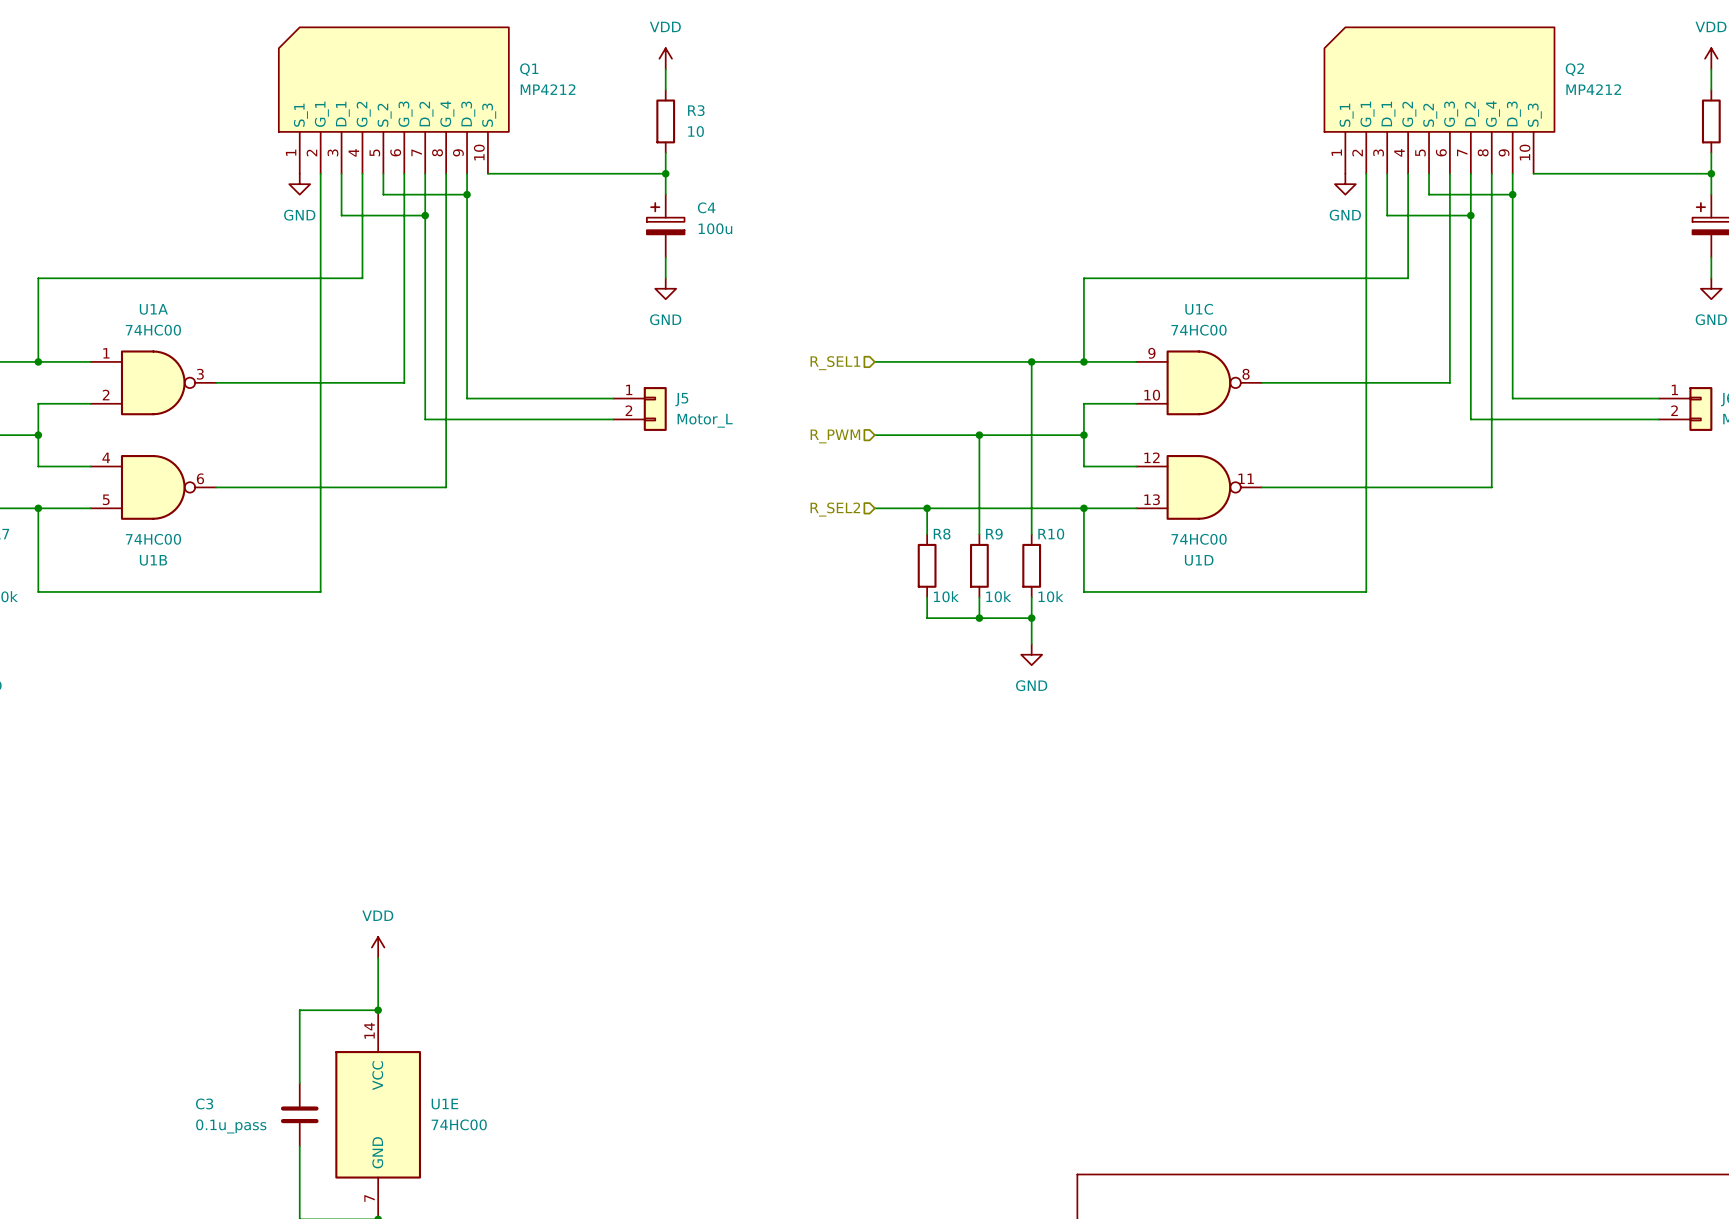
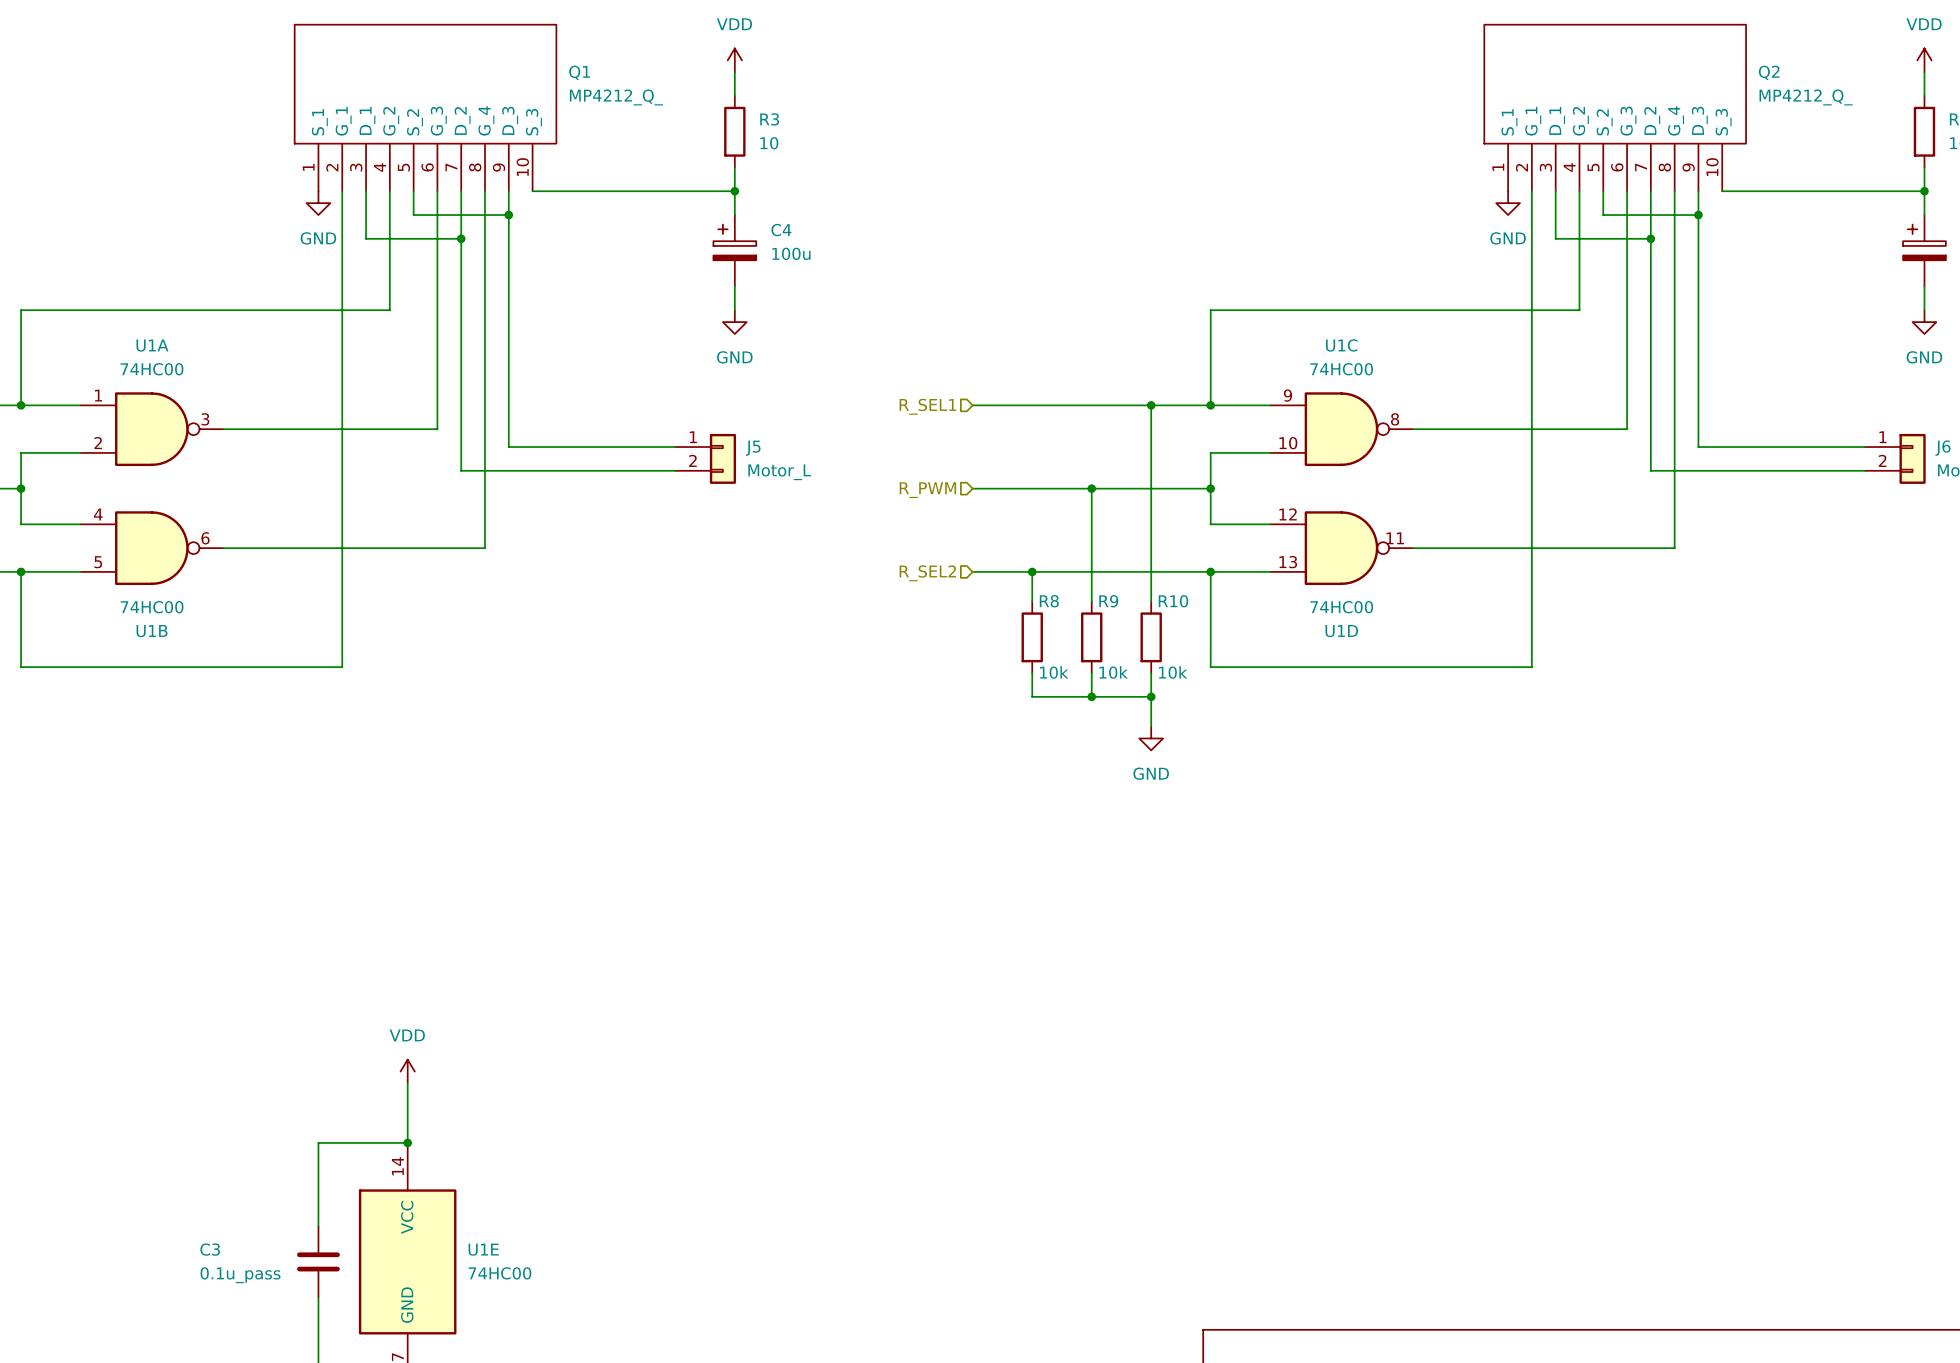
Q1 symbol: [278, 27, 509, 174] -> [293, 23, 558, 192]
Q2 symbol: [1324, 27, 1555, 174] -> [1483, 23, 1747, 192]
Q1 value: MP4212 (548, 89) -> MP4212_Q_ (616, 97)
Q2 value: MP4212 (1593, 89) -> MP4212_Q_ (1806, 97)

